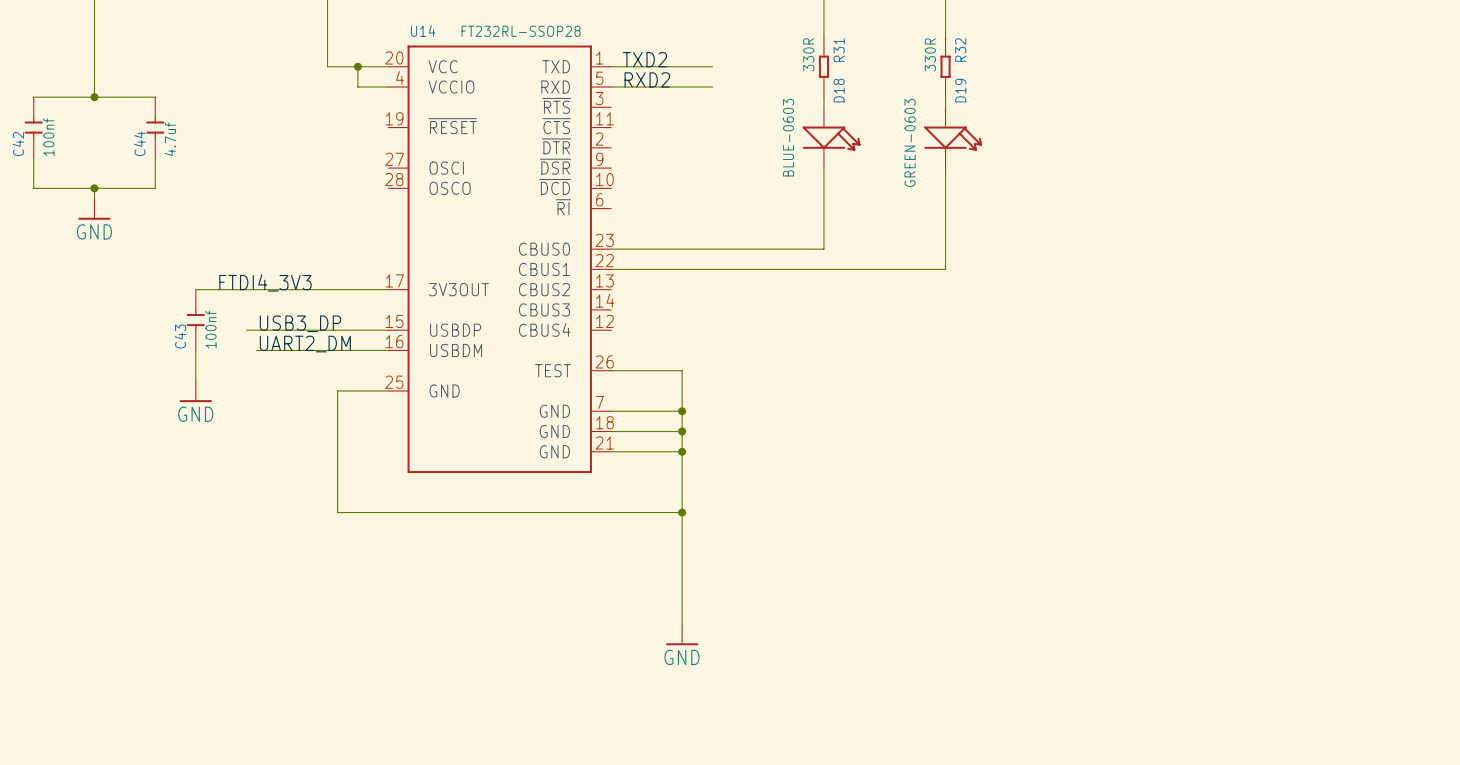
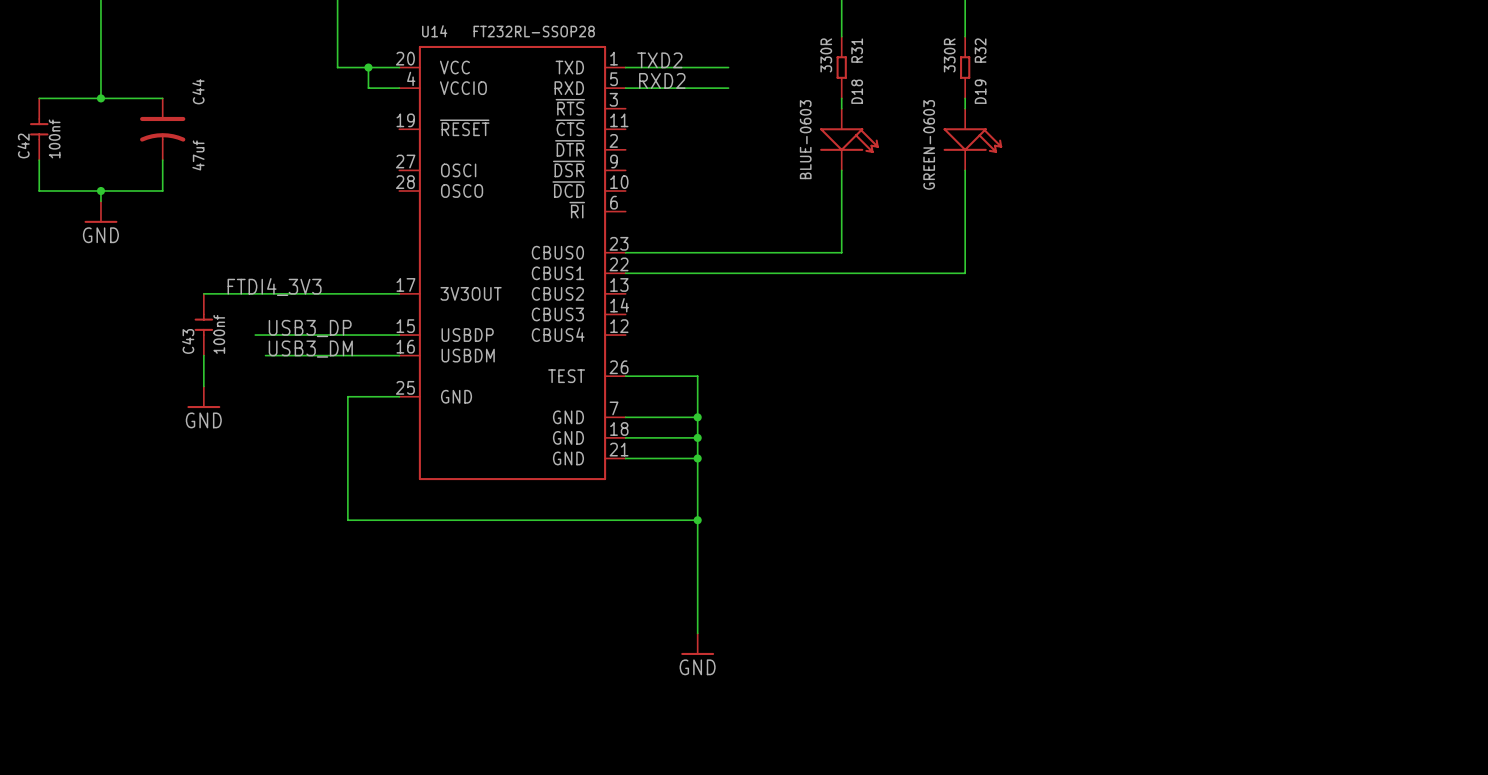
C44 symbol: [146, 97, 165, 158] -> [140, 98, 186, 161]
C44 value: 4.7uf (170, 139) -> 47uf (198, 155)
C44 name position: C44 (139, 143) -> C44 (198, 91)
label: UART2_DM (305, 344) -> USB3_DM (310, 349)

